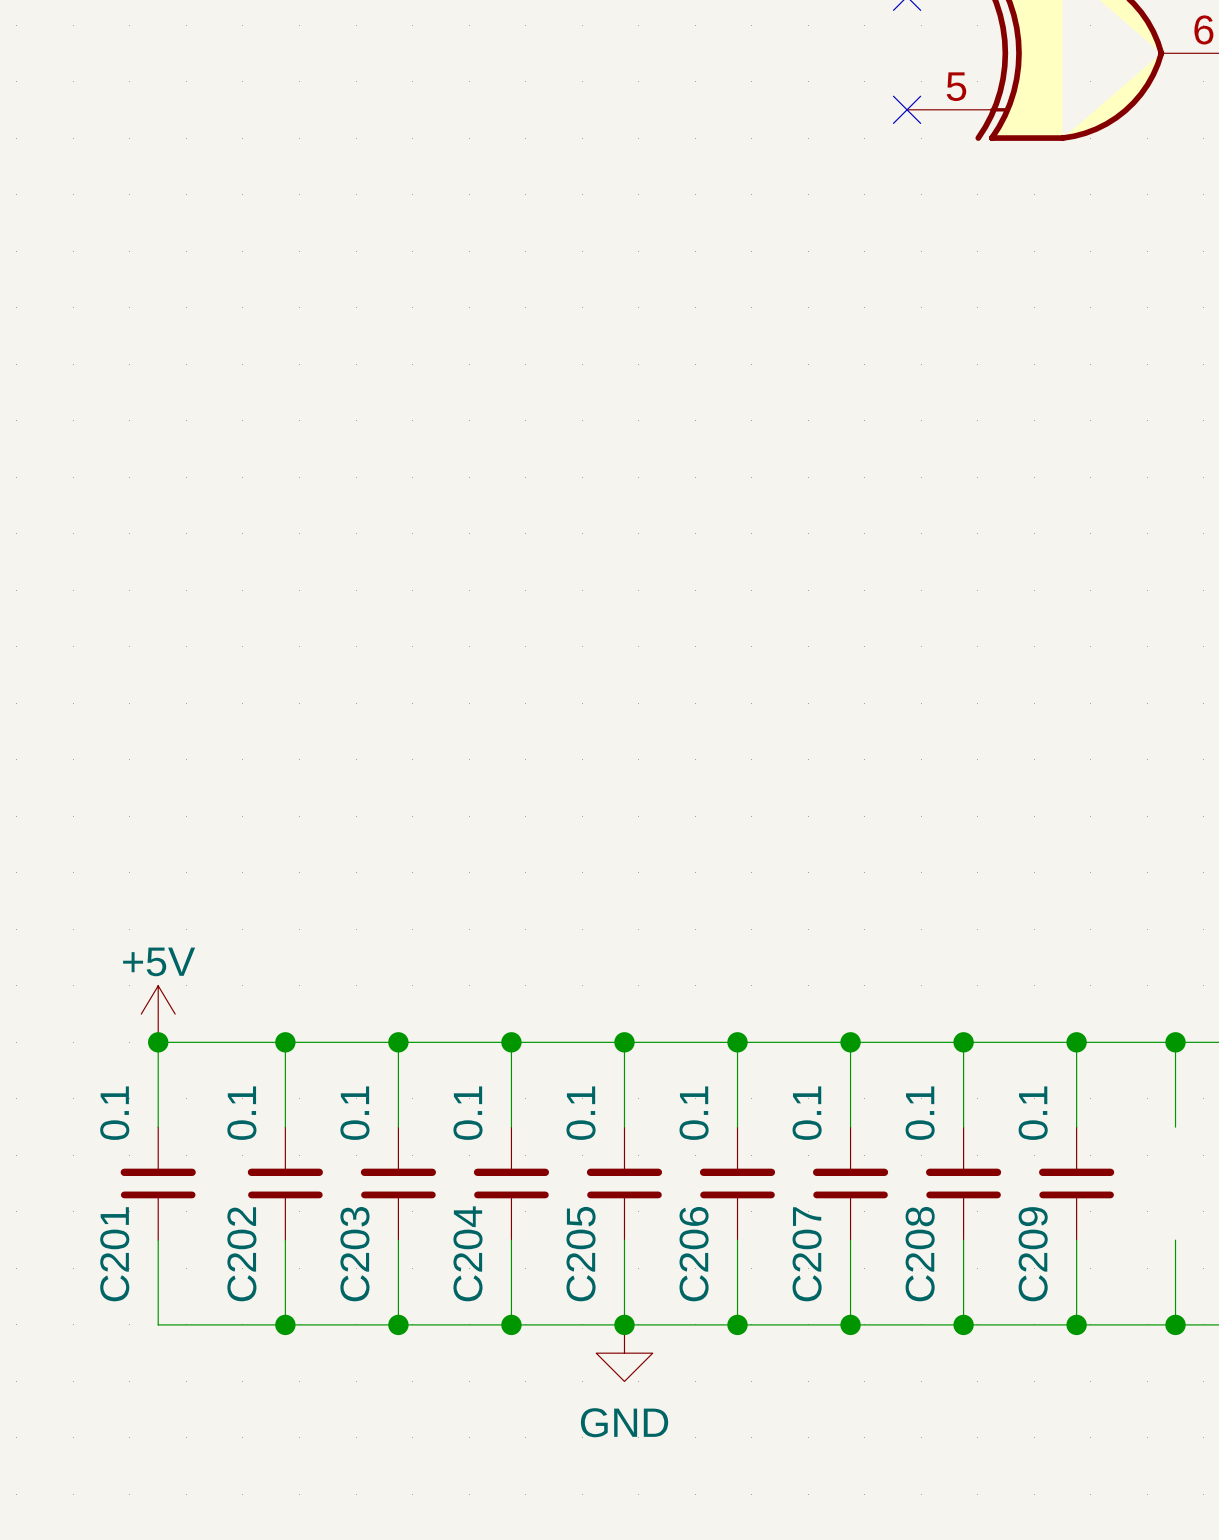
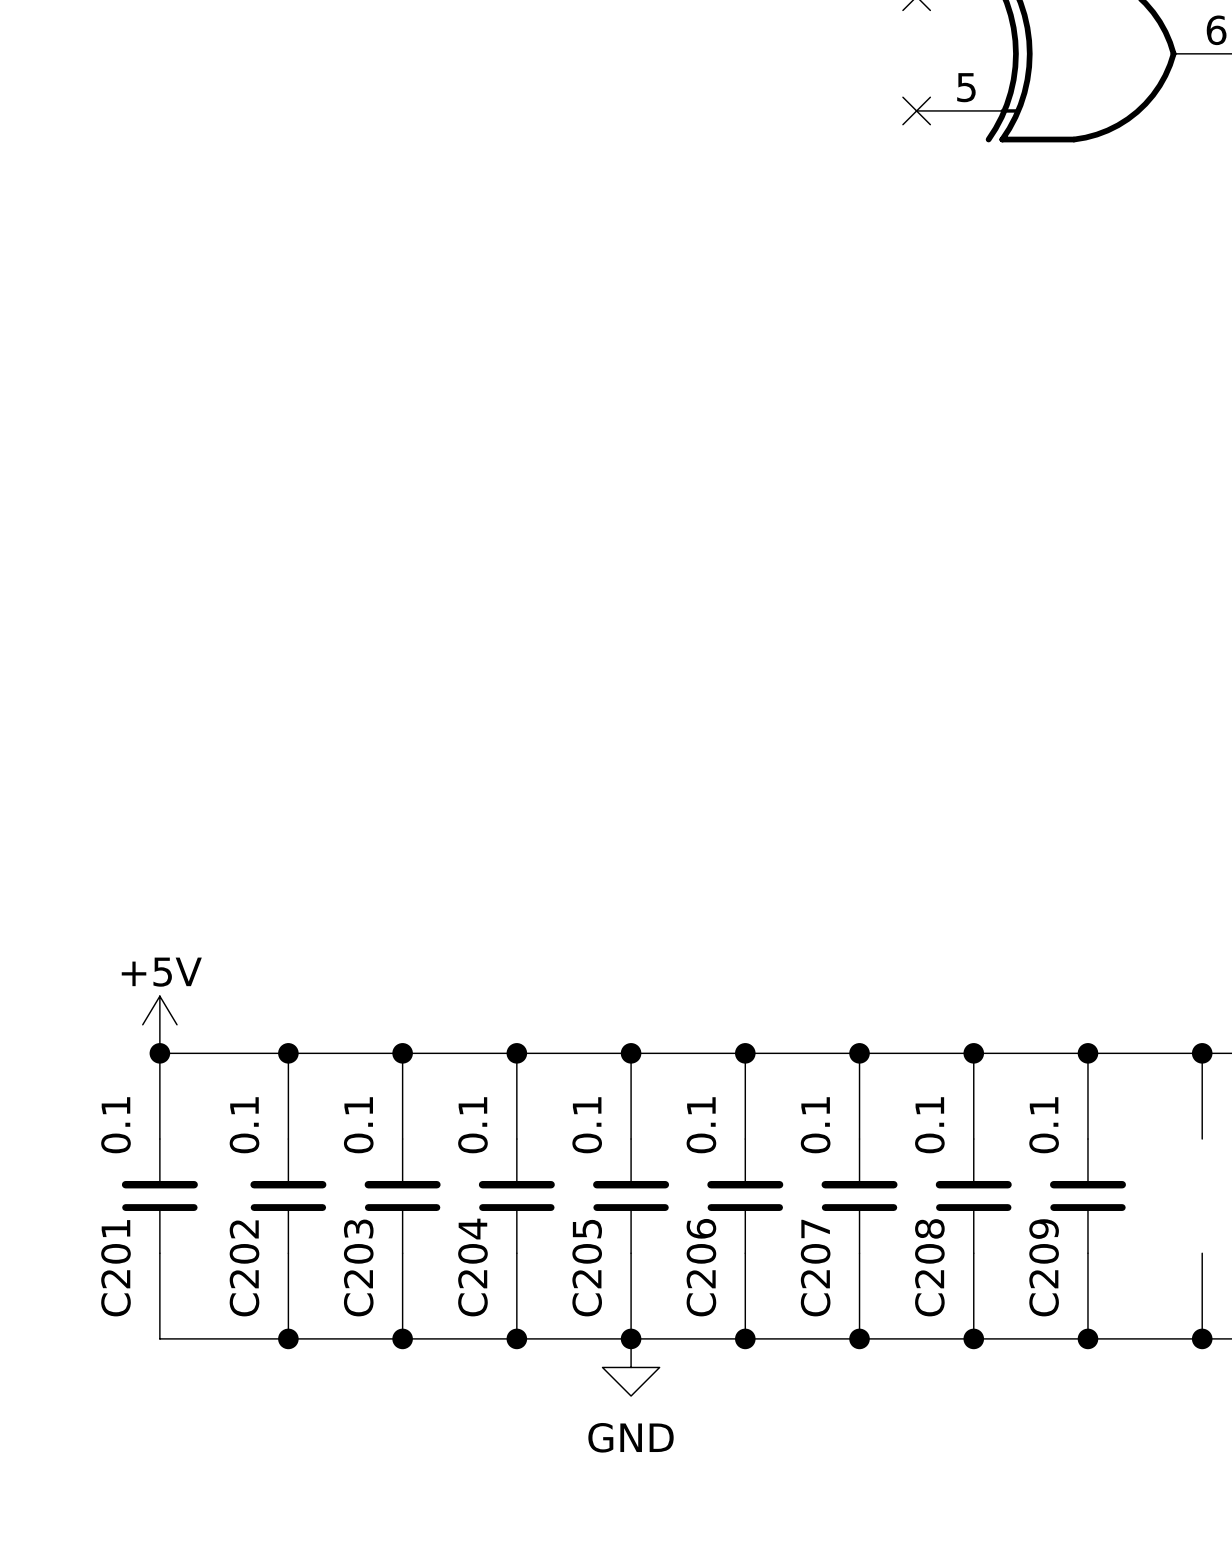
wire: (1175, 1042) (1175, 1127) -> (1202, 1053) (1202, 1139)
junction position: (1175, 1042) -> (1202, 1053)
wire: (1175, 1240) (1175, 1324) -> (1202, 1253) (1202, 1338)
junction position: (1175, 1324) -> (1202, 1338)

